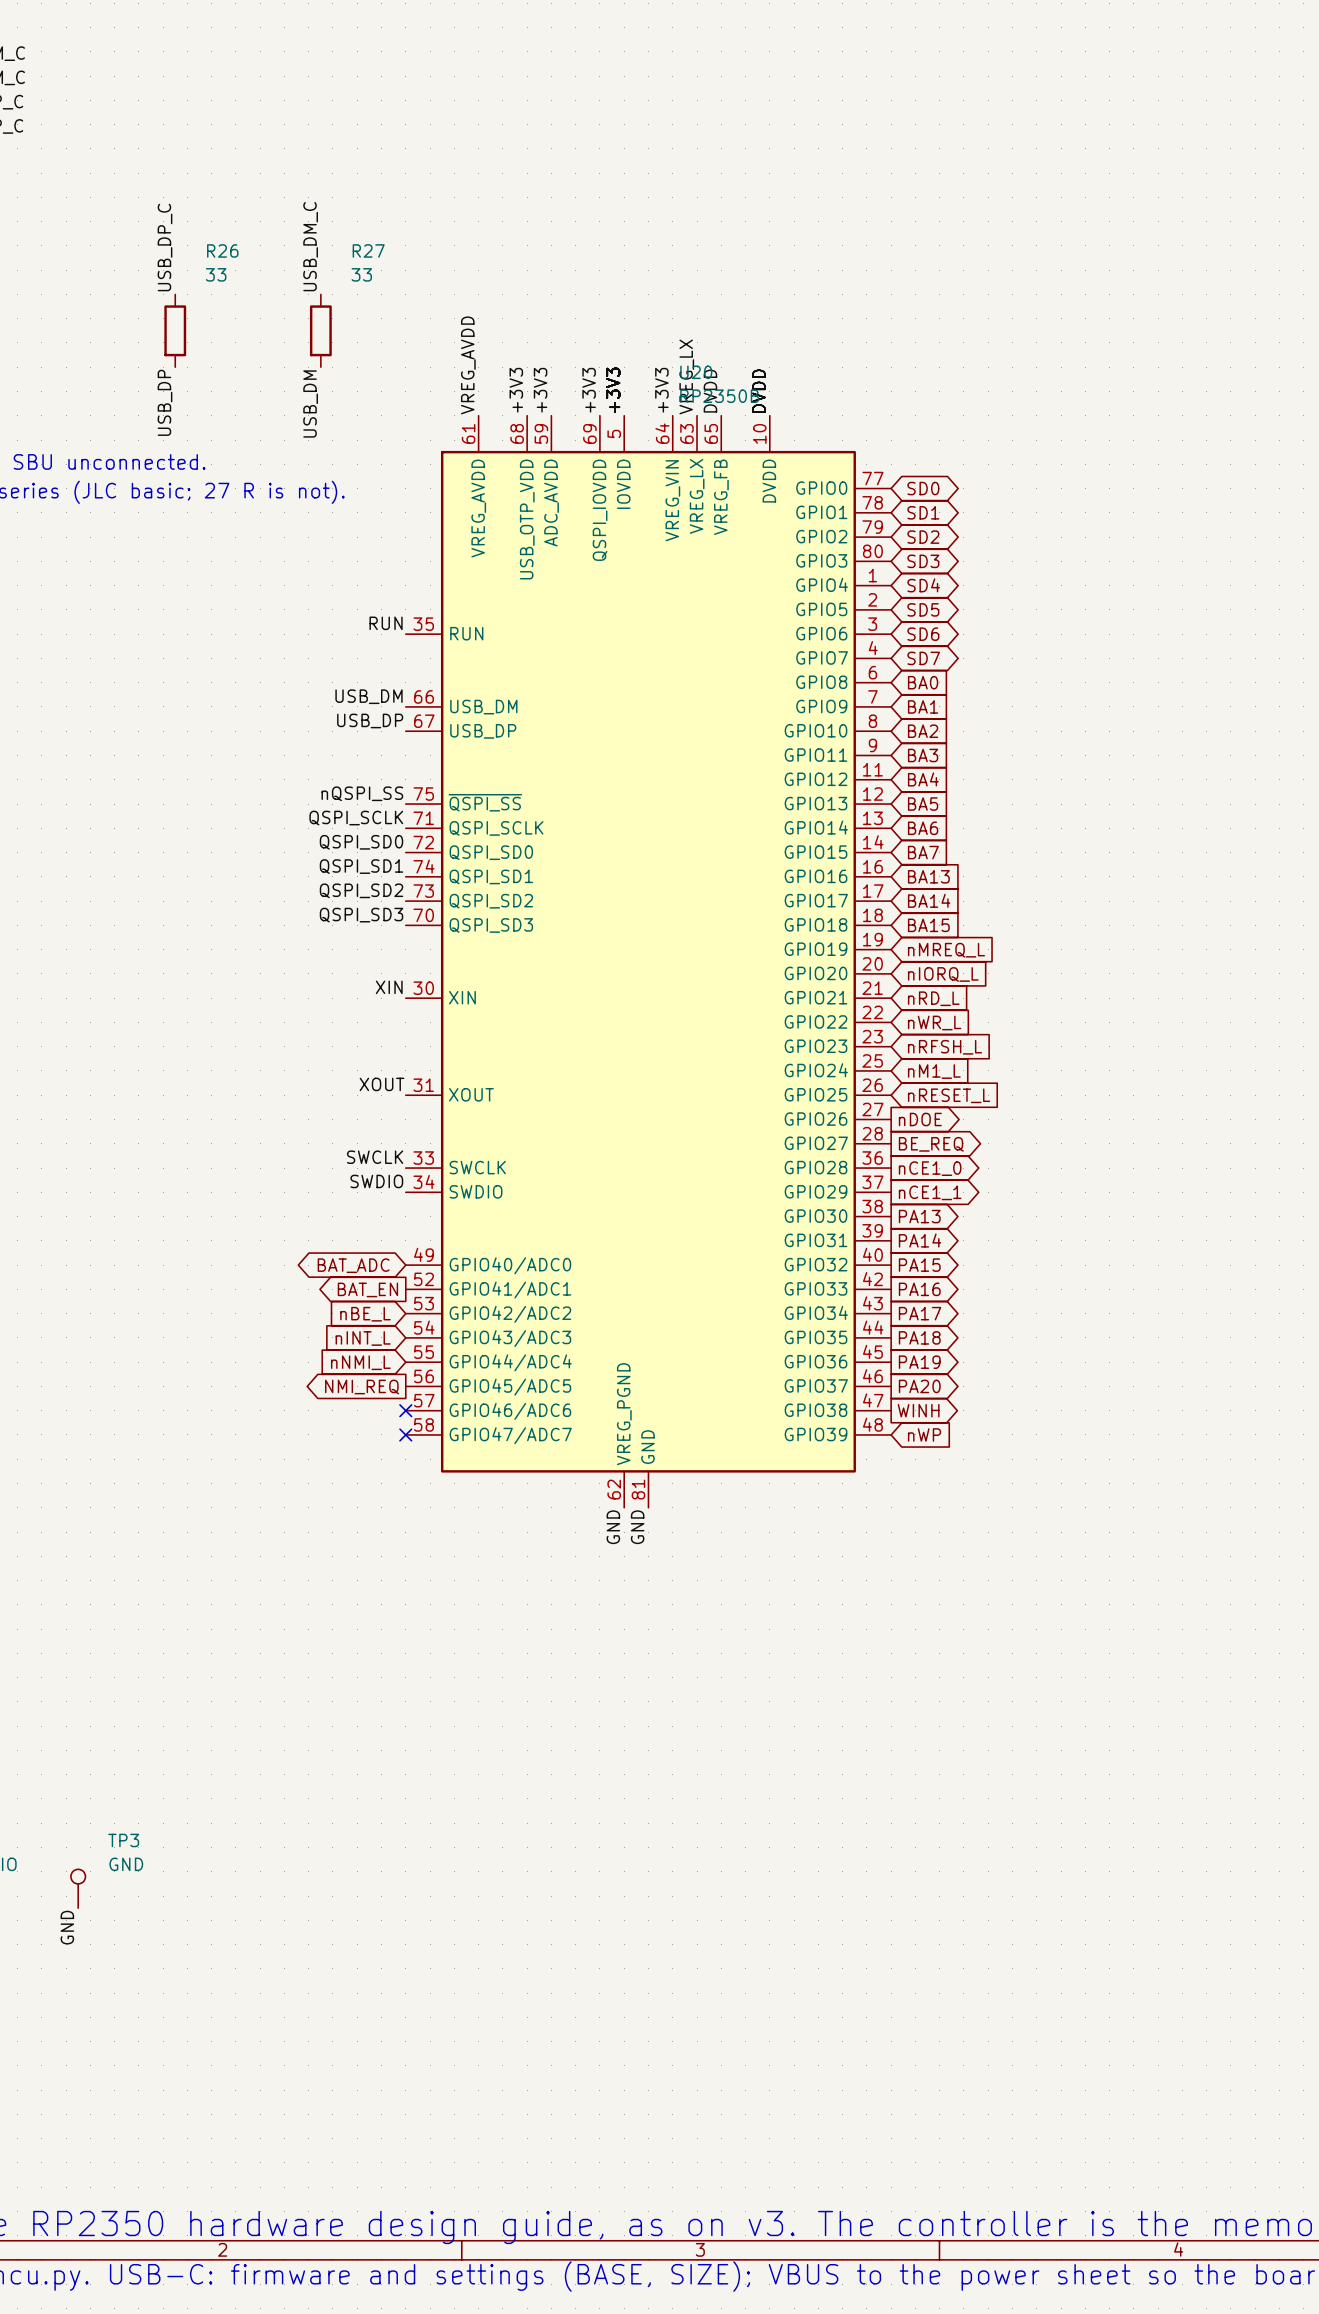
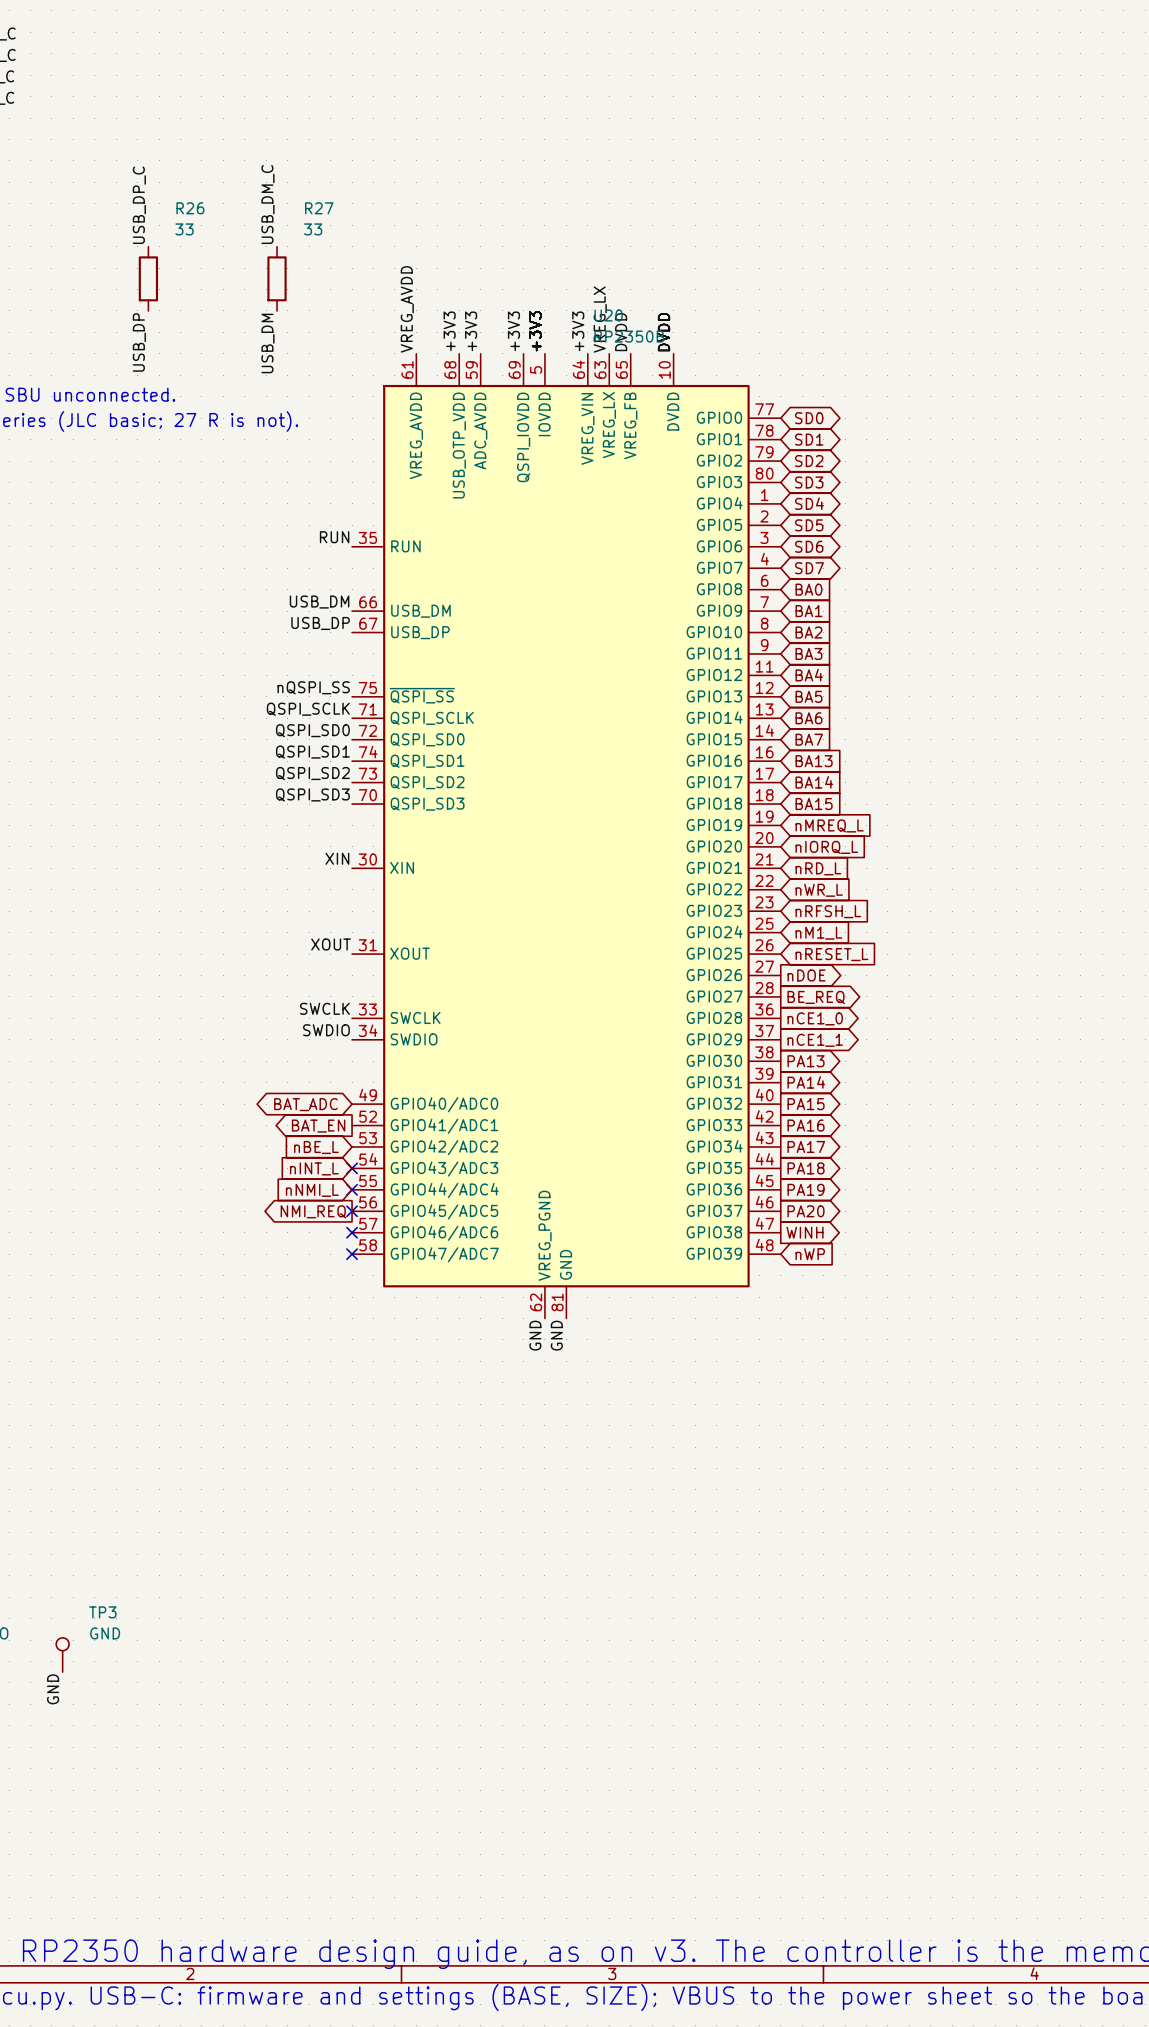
no-connect mark: none -> (352, 1168)
no-connect mark: none -> (352, 1189)
no-connect mark: none -> (352, 1211)

